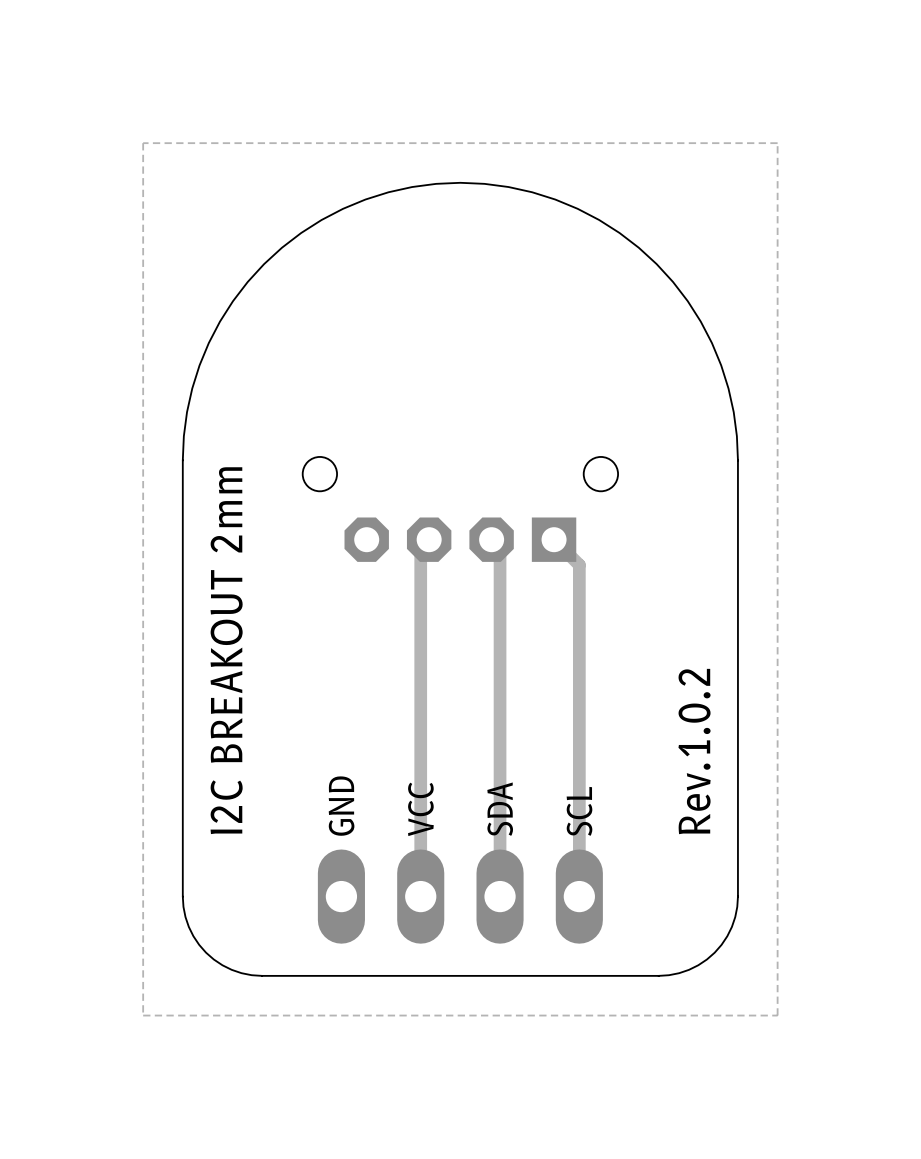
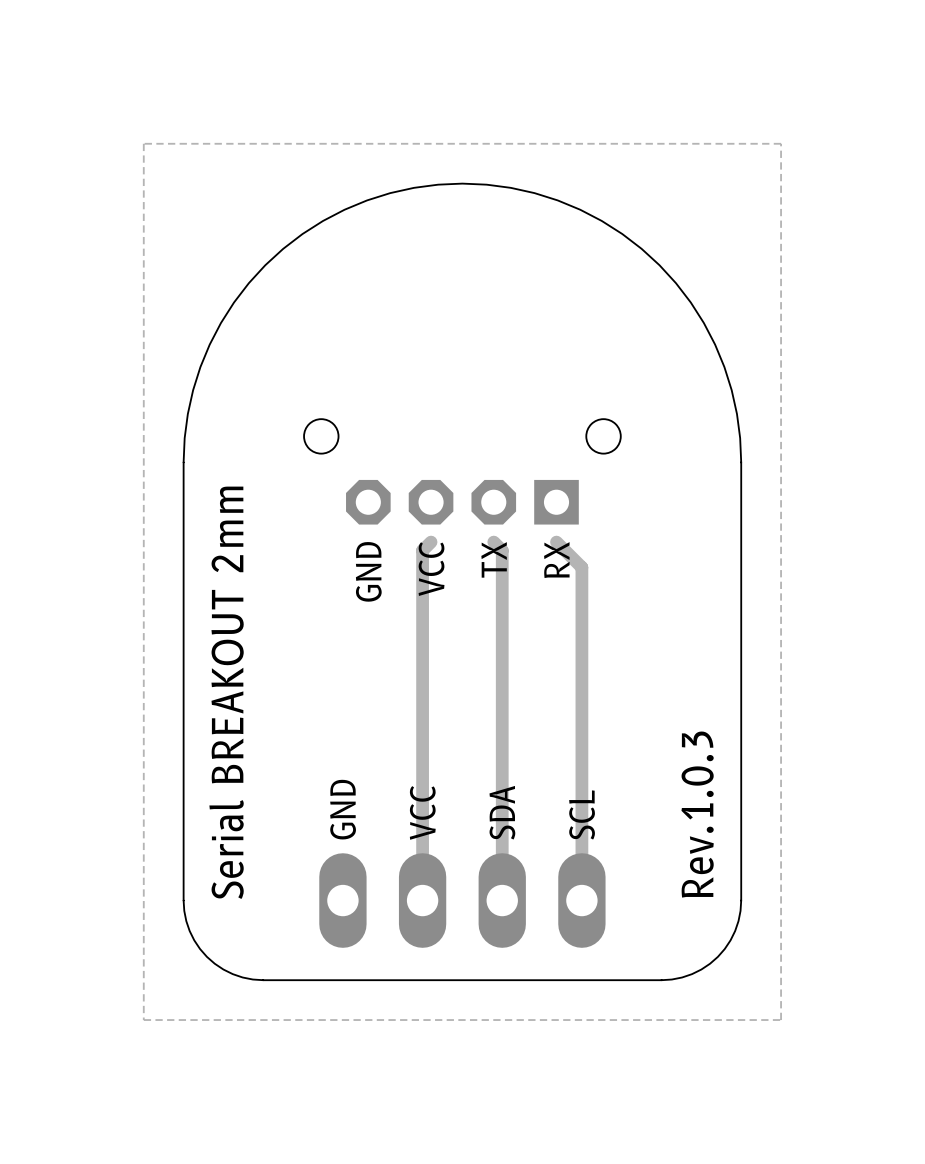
part position: (460, 509) -> (462, 471)
text: none -> TX (494, 559)
text: none -> RX (556, 560)
text: none -> VCC (431, 569)
text: none -> GND (368, 571)
text: I2C BREAKOUT 2mm (226, 650) -> Serial BREAKOUT 2mm (226, 692)
text: Rev.1.0.2 (694, 751) -> Rev.1.0.3 (697, 814)

